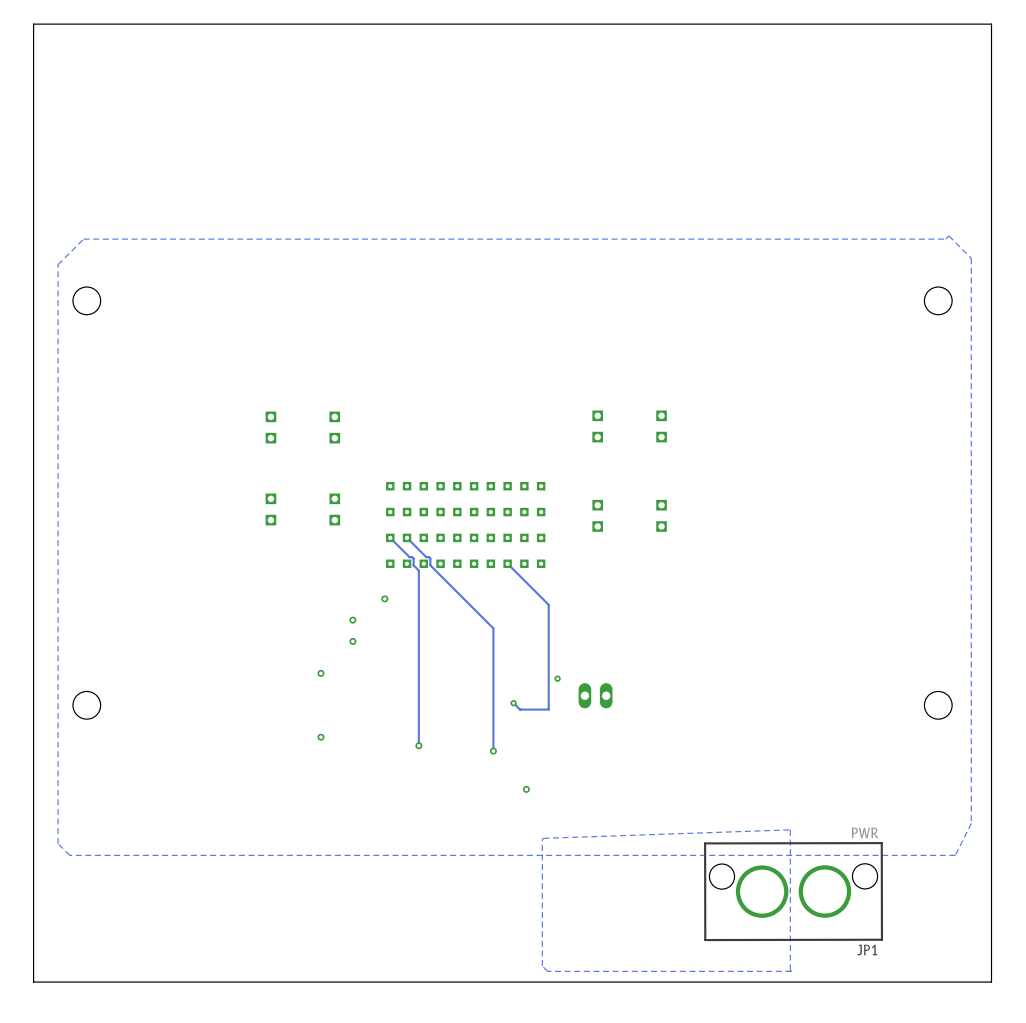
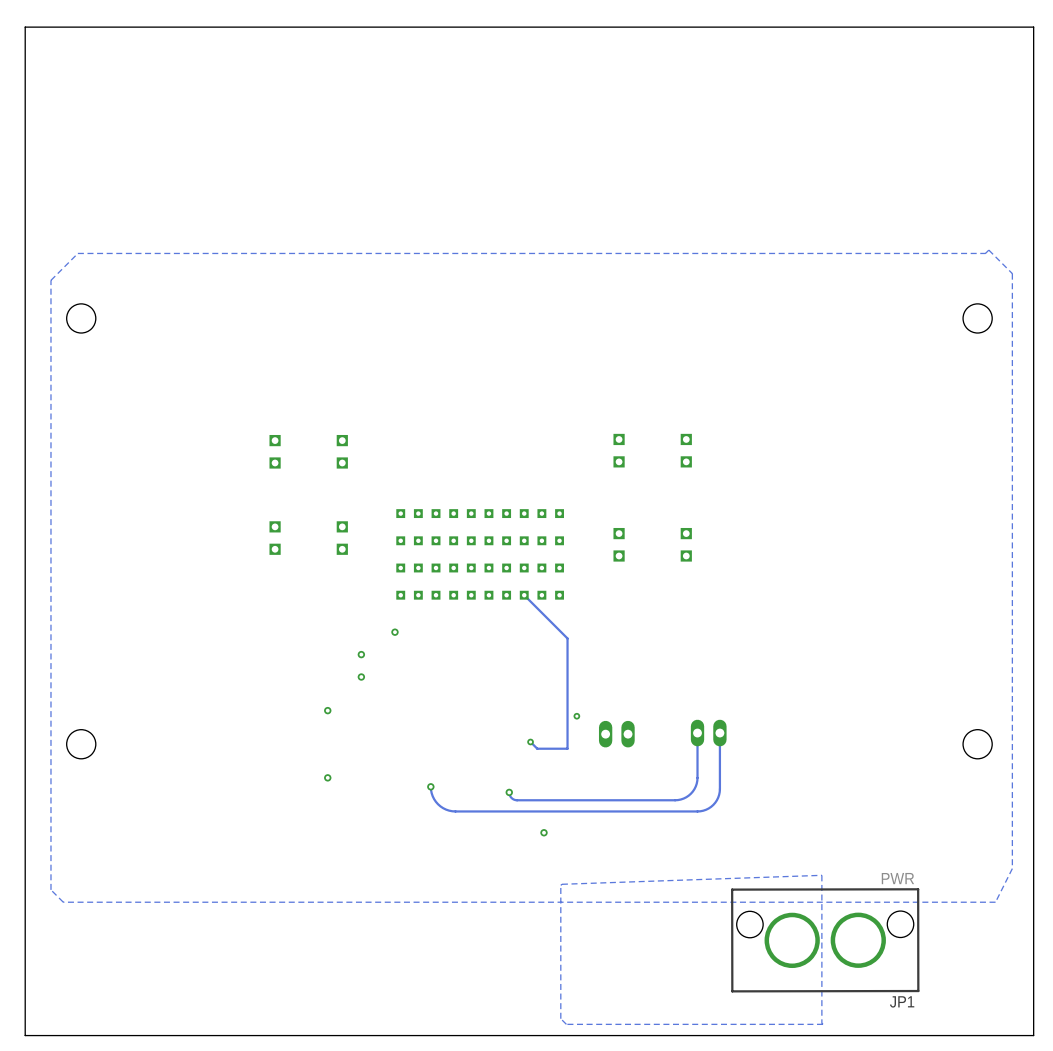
track: (390, 537) (409, 557) (413, 558) (413, 565) (418, 570) (418, 745) -> (719, 733) (719, 794) (713, 804) (700, 811) (452, 811) (438, 804) (432, 796) (430, 786)
track: (407, 537) (426, 557) (430, 558) (430, 565) (493, 628) (493, 751) -> (697, 733) (696, 783) (690, 793) (680, 799) (517, 800) (511, 797) (509, 792)
part: none -> (708, 733)

